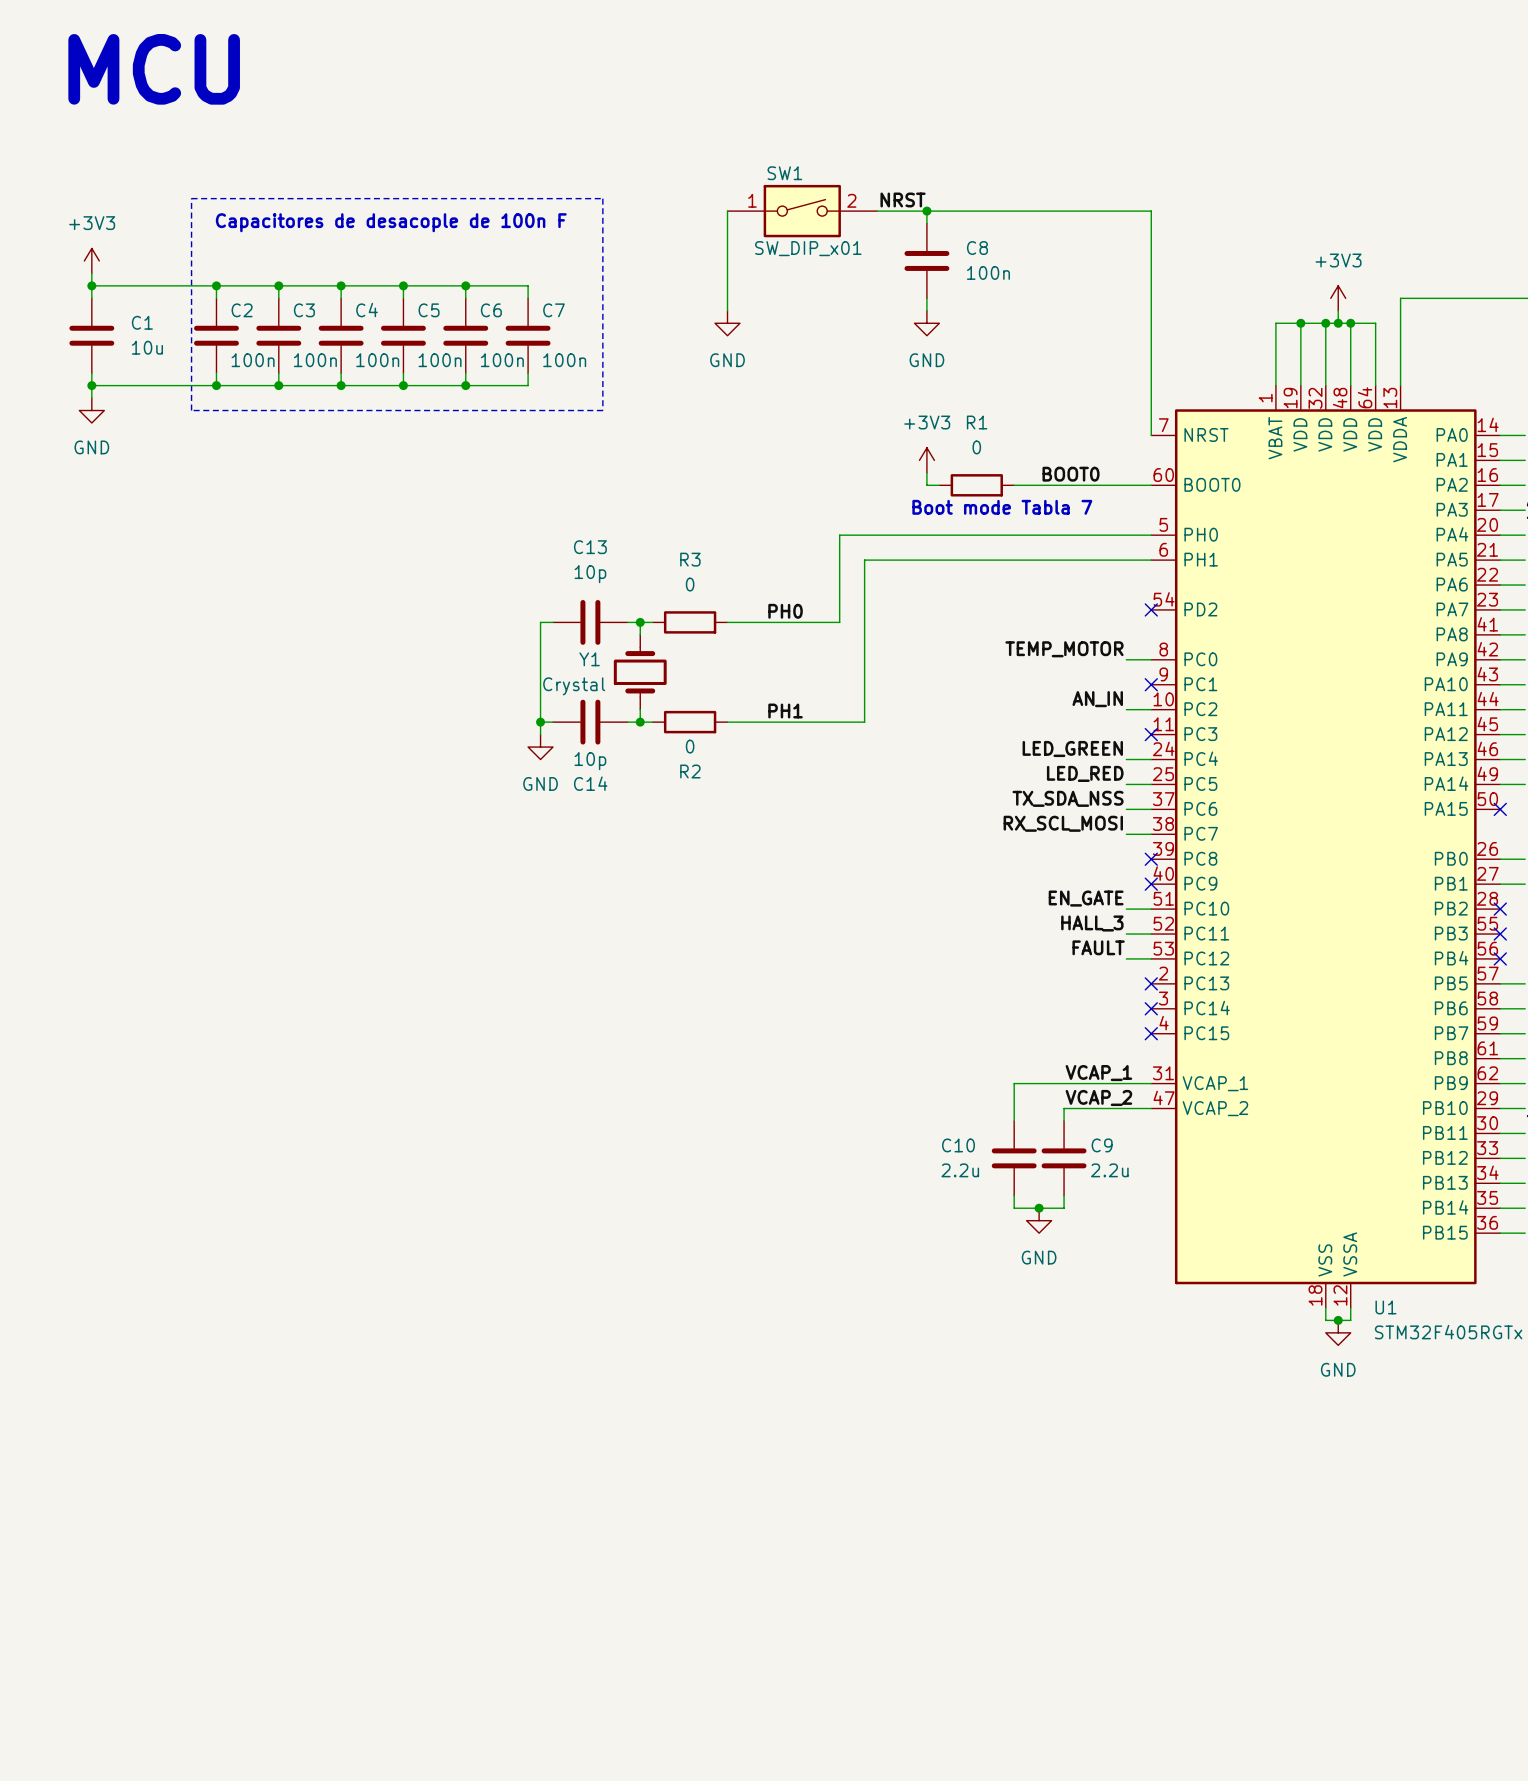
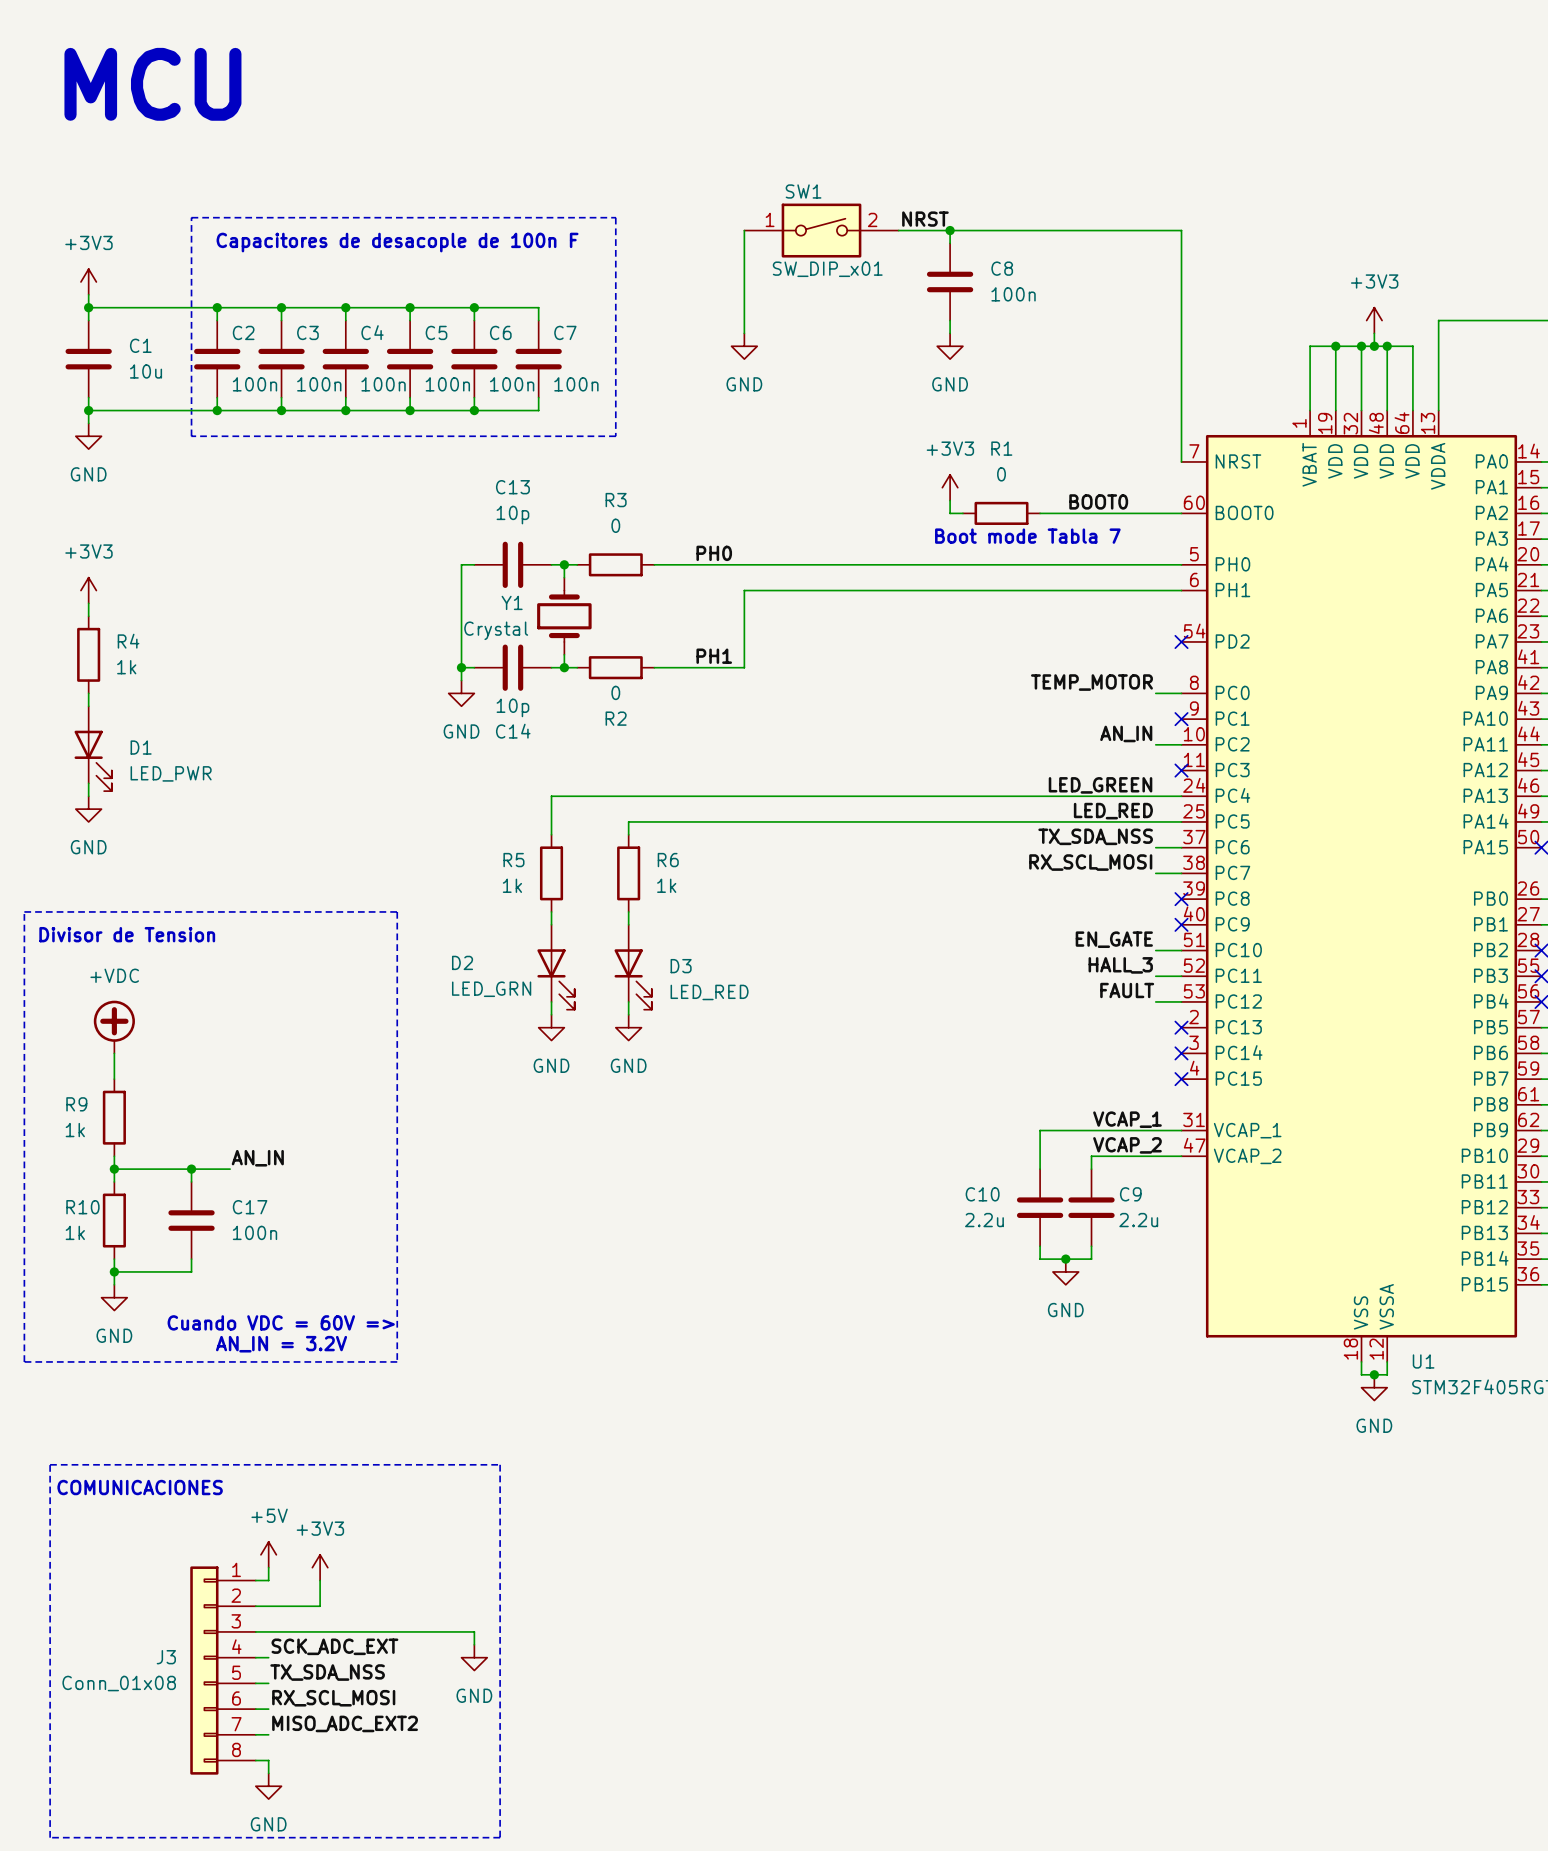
wire: none -> (474, 564) (461, 564) (461, 680)
junction: none -> (564, 564)
wire: (839, 535) (839, 622) (727, 622) -> (860, 564) (654, 564)
power symbol: none -> +3V3 (88, 590)
wire: (864, 560) (864, 722) (727, 722) -> (885, 590) (744, 590) (744, 667) (654, 667)
wire: none -> (88, 603) (88, 616)
label position: PH0 (785, 611) -> PH0 (714, 553)
R4: none -> 1k (88, 654)
wire: (553, 622) (540, 622) (540, 734) -> (564, 654) (564, 667)
C13 position: (590, 622) -> (512, 564)
wire: (627, 622) (652, 622) -> (551, 564) (577, 564)
wire: (640, 622) (640, 634) -> (564, 564) (564, 577)
junction: (640, 622) -> none
R3 position: (690, 622) -> (615, 564)
junction: none -> (461, 667)
junction: none -> (564, 667)
wire: none -> (88, 693) (88, 706)
power symbol: none -> GND (461, 693)
Y1 position: (640, 672) -> (564, 616)
wire: (640, 709) (640, 722) -> (628, 911) (628, 924)
label position: PH1 (785, 711) -> PH1 (714, 656)
D1: none -> LED_PWR (93, 748)
wire: (540, 722) (553, 722) -> (461, 667) (474, 667)
junction: (540, 722) -> none
C14 position: (590, 722) -> (512, 667)
wire: (627, 722) (652, 722) -> (551, 667) (577, 667)
junction: (640, 722) -> none
R2 position: (690, 722) -> (615, 667)
wire: none -> (88, 783) (88, 796)
power symbol: GND (540, 747) -> none
wire: none -> (1155, 796) (551, 796) (551, 834)
power symbol: none -> GND (88, 809)
wire: none -> (1155, 821) (628, 821) (628, 834)
R5: none -> 1k (551, 873)
R6: none -> 1k (628, 873)
line: none -> (24, 911) (397, 911) (397, 1361) (24, 1361) (24, 911)
wire: none -> (551, 911) (551, 924)
text: none -> Divisor de Tension (127, 934)
D2: none -> LED_GRN (556, 967)
D3: none -> LED_RED (633, 967)
wire: none -> (551, 1001) (551, 1014)
wire: none -> (628, 1001) (628, 1014)
power symbol: none -> +VDC (114, 1027)
power symbol: none -> GND (551, 1027)
power symbol: none -> GND (628, 1027)
wire: none -> (114, 1053) (114, 1079)
R9: none -> 1k (114, 1117)
wire: none -> (114, 1156) (114, 1181)
label: none -> AN_IN (257, 1158)
wire: none -> (114, 1169) (230, 1169)
junction: none -> (114, 1169)
wire: none -> (191, 1169) (191, 1181)
junction: none -> (191, 1169)
R10: none -> 1k (114, 1220)
C17: none -> 100n (191, 1220)
wire: none -> (114, 1259) (114, 1284)
wire: none -> (191, 1259) (191, 1271) (114, 1271)
junction: none -> (114, 1271)
power symbol: none -> GND (114, 1297)
text: none -> Cuando VDC = 60V => (281, 1322)
text: none -> AN_IN = 3.2V (281, 1344)
line: none -> (50, 1464) (500, 1464) (500, 1837) (50, 1837) (50, 1464)
text: none -> COMUNICACIONES (140, 1487)
power symbol: none -> +5V (268, 1554)
wire: none -> (268, 1567) (268, 1580) (255, 1580)
power symbol: none -> +3V3 (320, 1567)
wire: none -> (320, 1580) (320, 1606) (255, 1606)
wire: none -> (255, 1631) (474, 1631) (474, 1644)
label: none -> SCK_ADC_EXT (334, 1646)
wire: none -> (255, 1657) (268, 1657)
power symbol: none -> GND (474, 1657)
J3: none -> Conn_01x08 (223, 1670)
label: none -> TX_SDA_NSS (327, 1672)
wire: none -> (255, 1683) (268, 1683)
label: none -> RX_SCL_MOSI (333, 1698)
wire: none -> (255, 1709) (268, 1709)
label: none -> MISO_ADC_EXT2 (345, 1723)
wire: none -> (255, 1734) (268, 1734)
wire: none -> (255, 1760) (268, 1760) (268, 1773)
power symbol: none -> GND (268, 1786)

